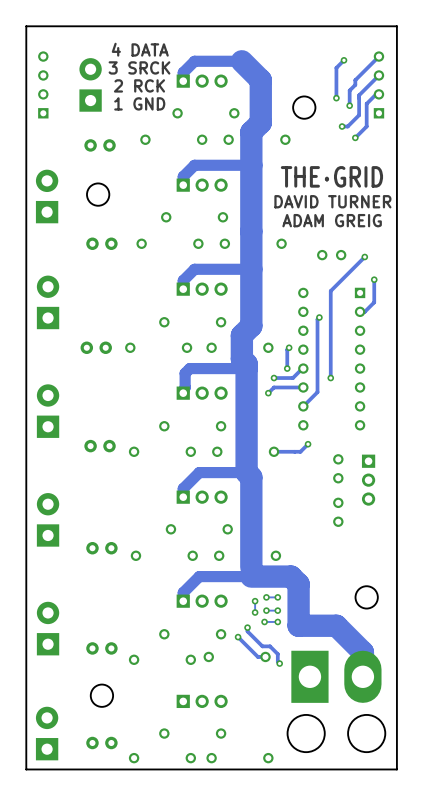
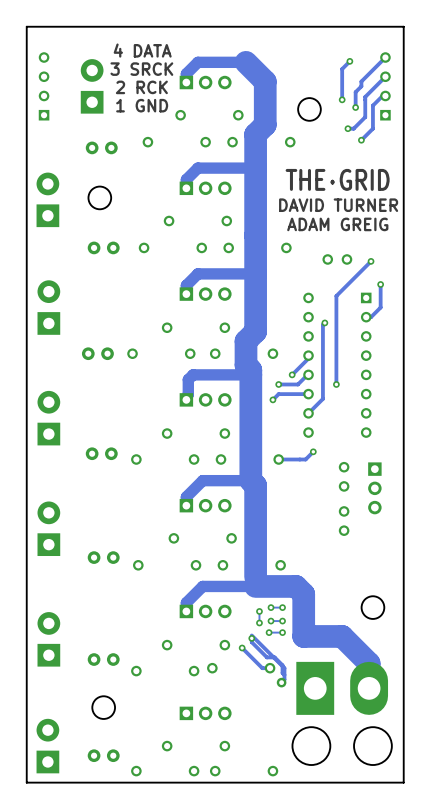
track: (289, 347) (287, 349) (287, 368) -> (308, 355) (308, 358) (292, 374)
via: (289, 347) -> none
track: none -> (251, 635) (284, 668) (284, 679) (281, 682)
via: (279, 663) -> none
via: none -> (281, 682)

